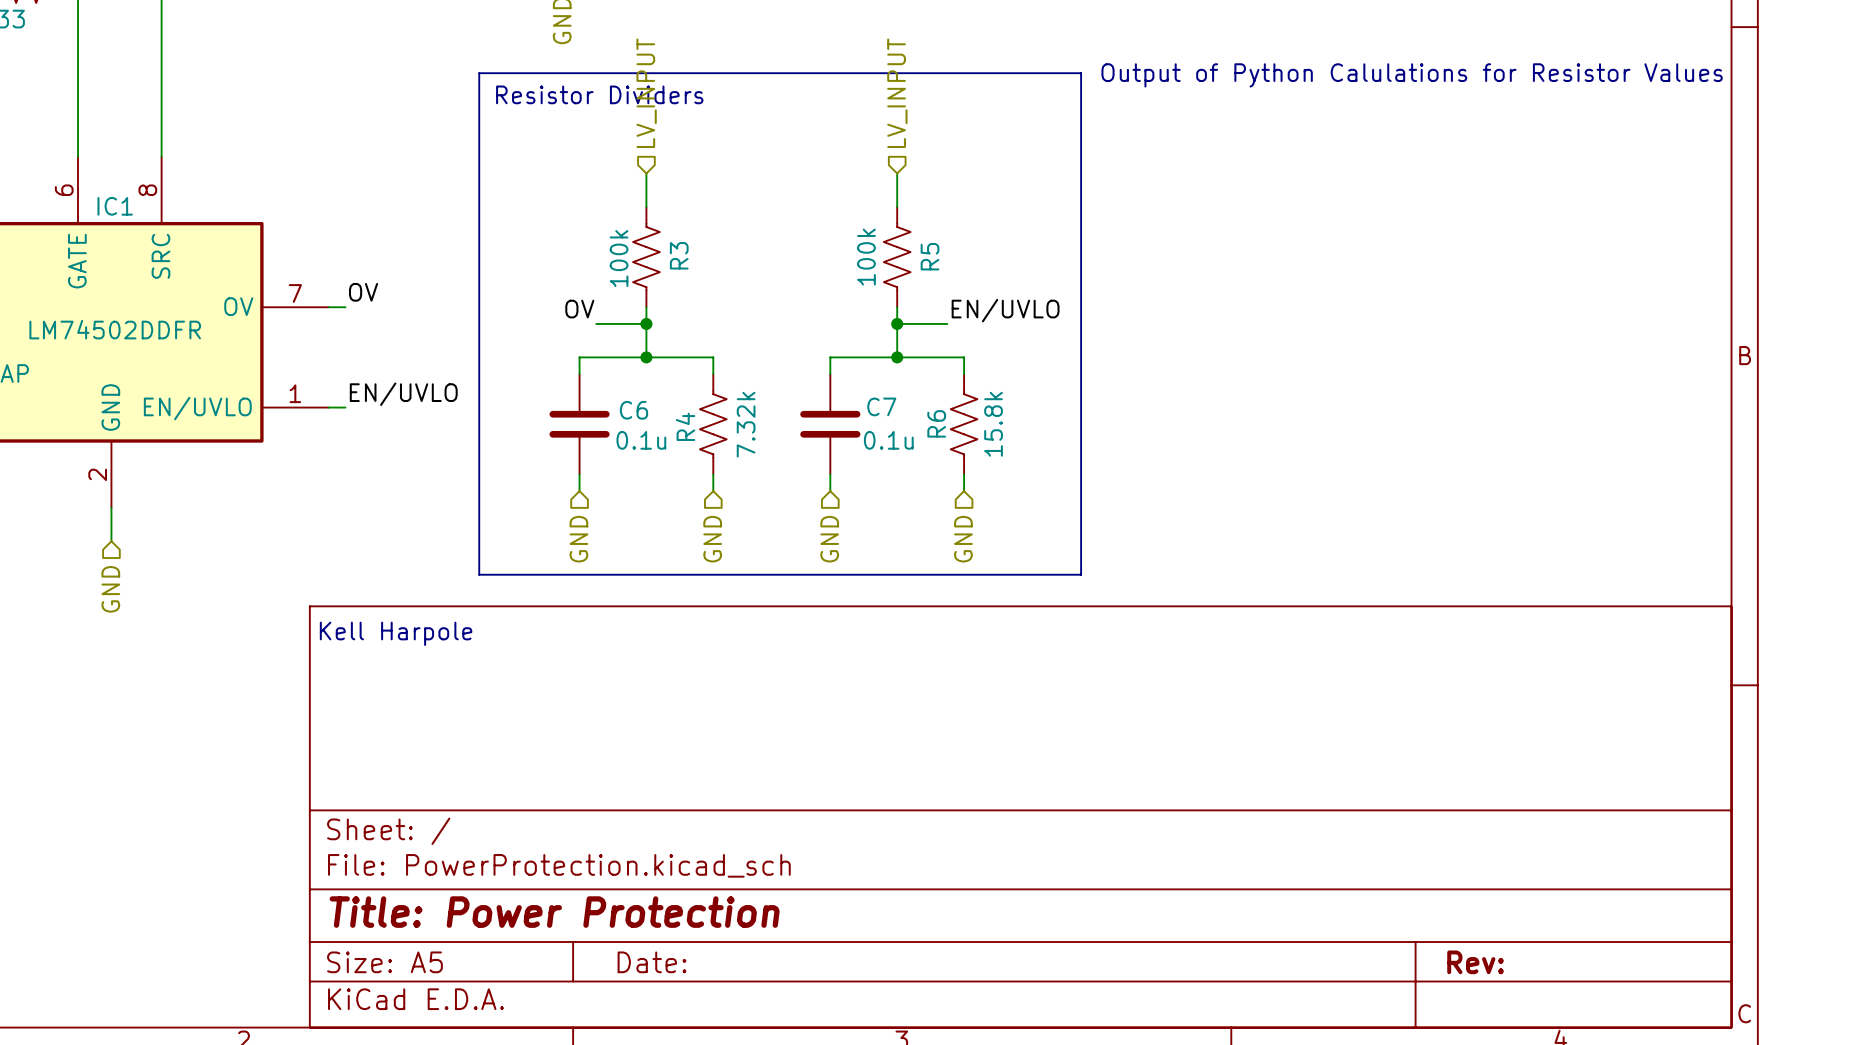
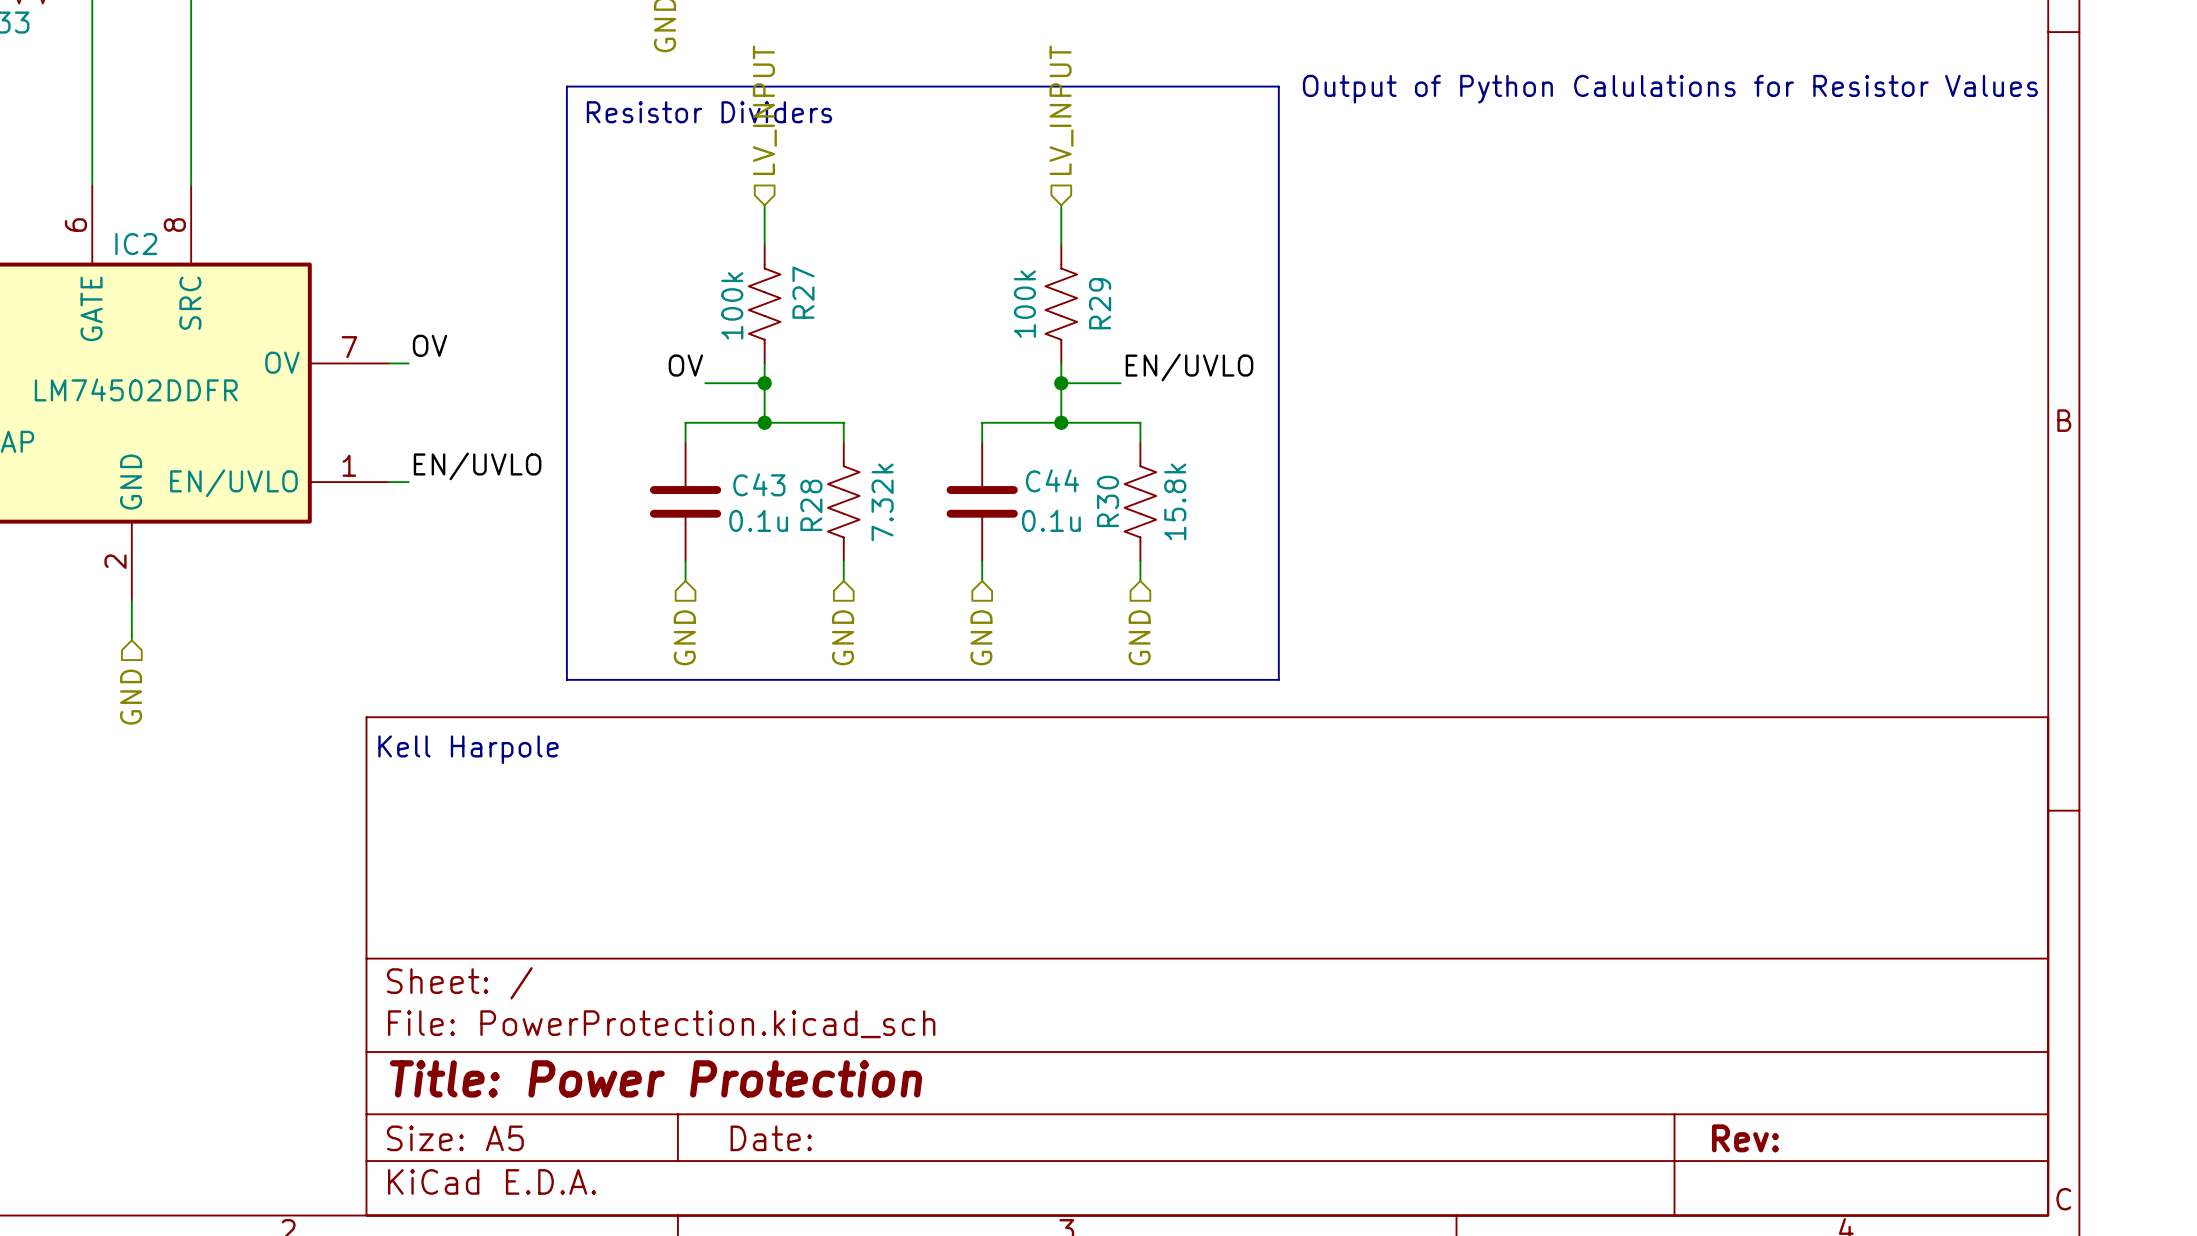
IC1 name: IC1 (115, 206) -> IC2 (136, 244)
R3 name: R3 (679, 255) -> R27 (803, 292)
R5 name: R5 (930, 256) -> R29 (1100, 303)
C7 name: C7 (881, 406) -> C44 (1052, 480)
C6 name: C6 (633, 410) -> C43 (759, 484)
R6 name: R6 (936, 423) -> R30 (1108, 501)
R4 name: R4 (685, 426) -> R28 (811, 505)

